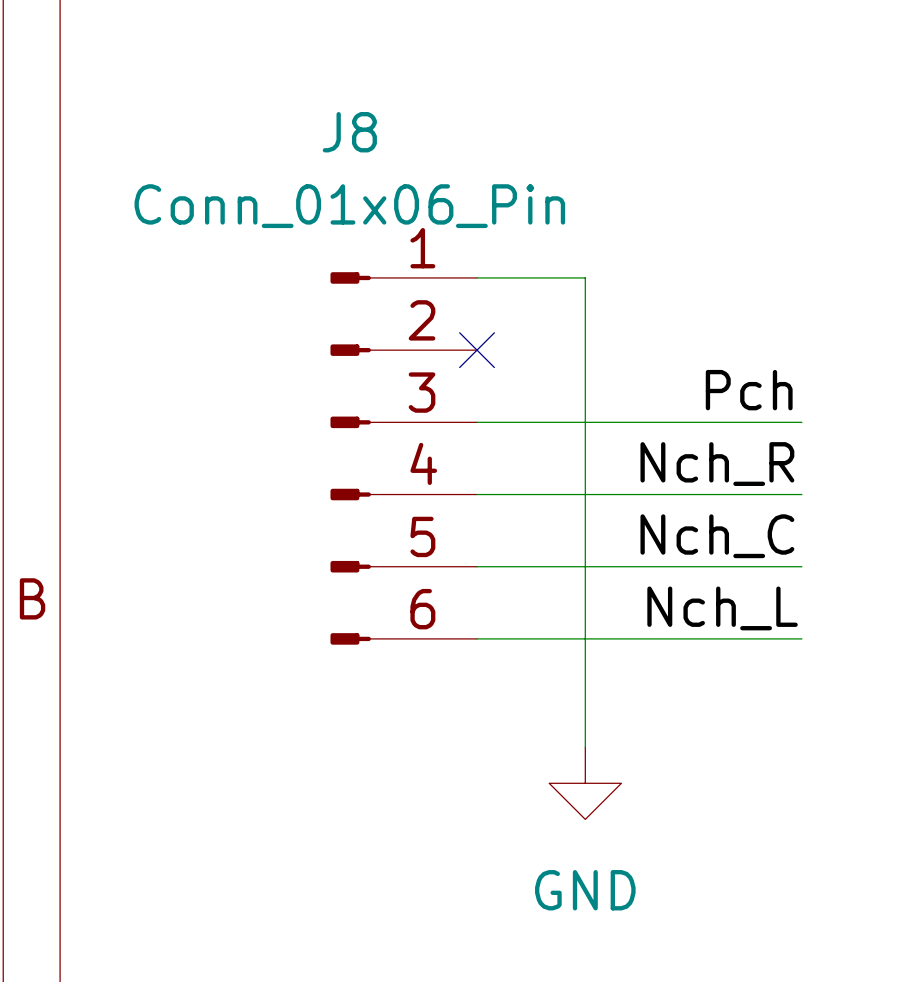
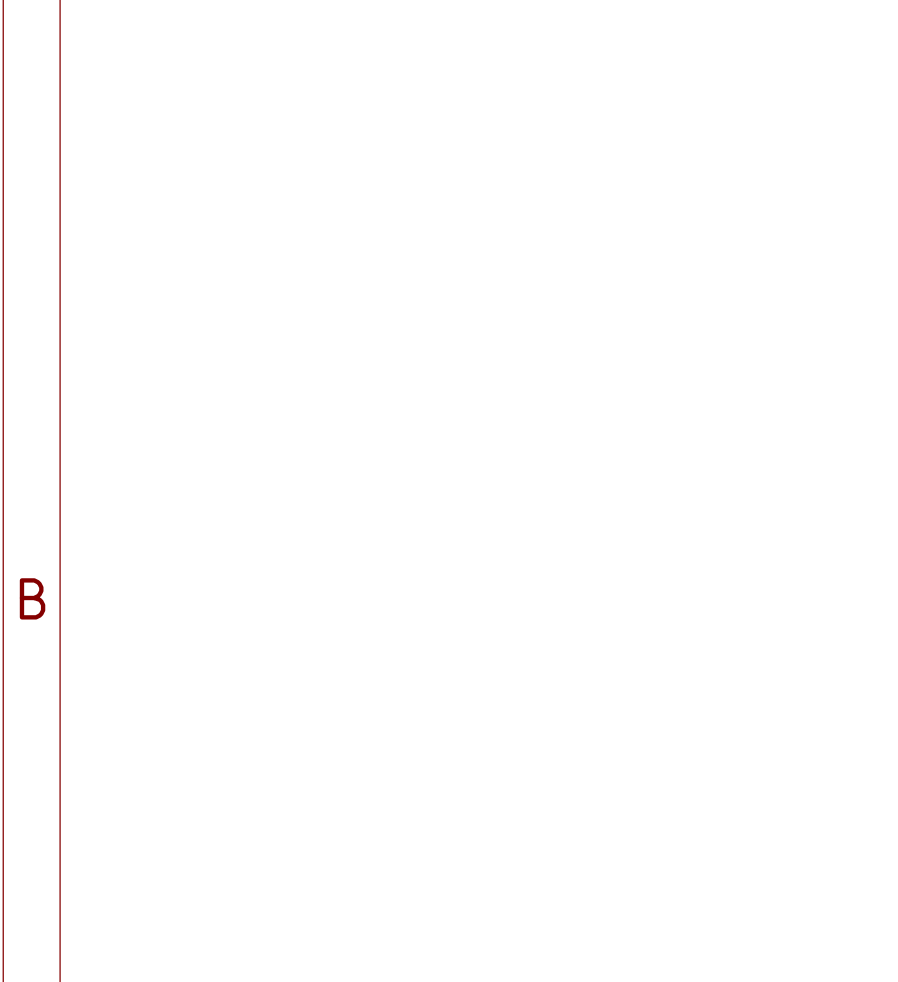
wire: (477, 277) (585, 277) (585, 747) -> none
no-connect mark: (477, 350) -> none
label: Pch (749, 390) -> none
wire: (477, 422) (801, 422) -> none
J8: Conn_01x06_Pin (403, 458) -> none
label: Nch_R (717, 464) -> none
wire: (477, 494) (801, 494) -> none
label: Nch_C (717, 536) -> none
wire: (477, 566) (801, 566) -> none
label: Nch_L (722, 608) -> none
wire: (477, 638) (801, 638) -> none
power symbol: GND (585, 783) -> none

